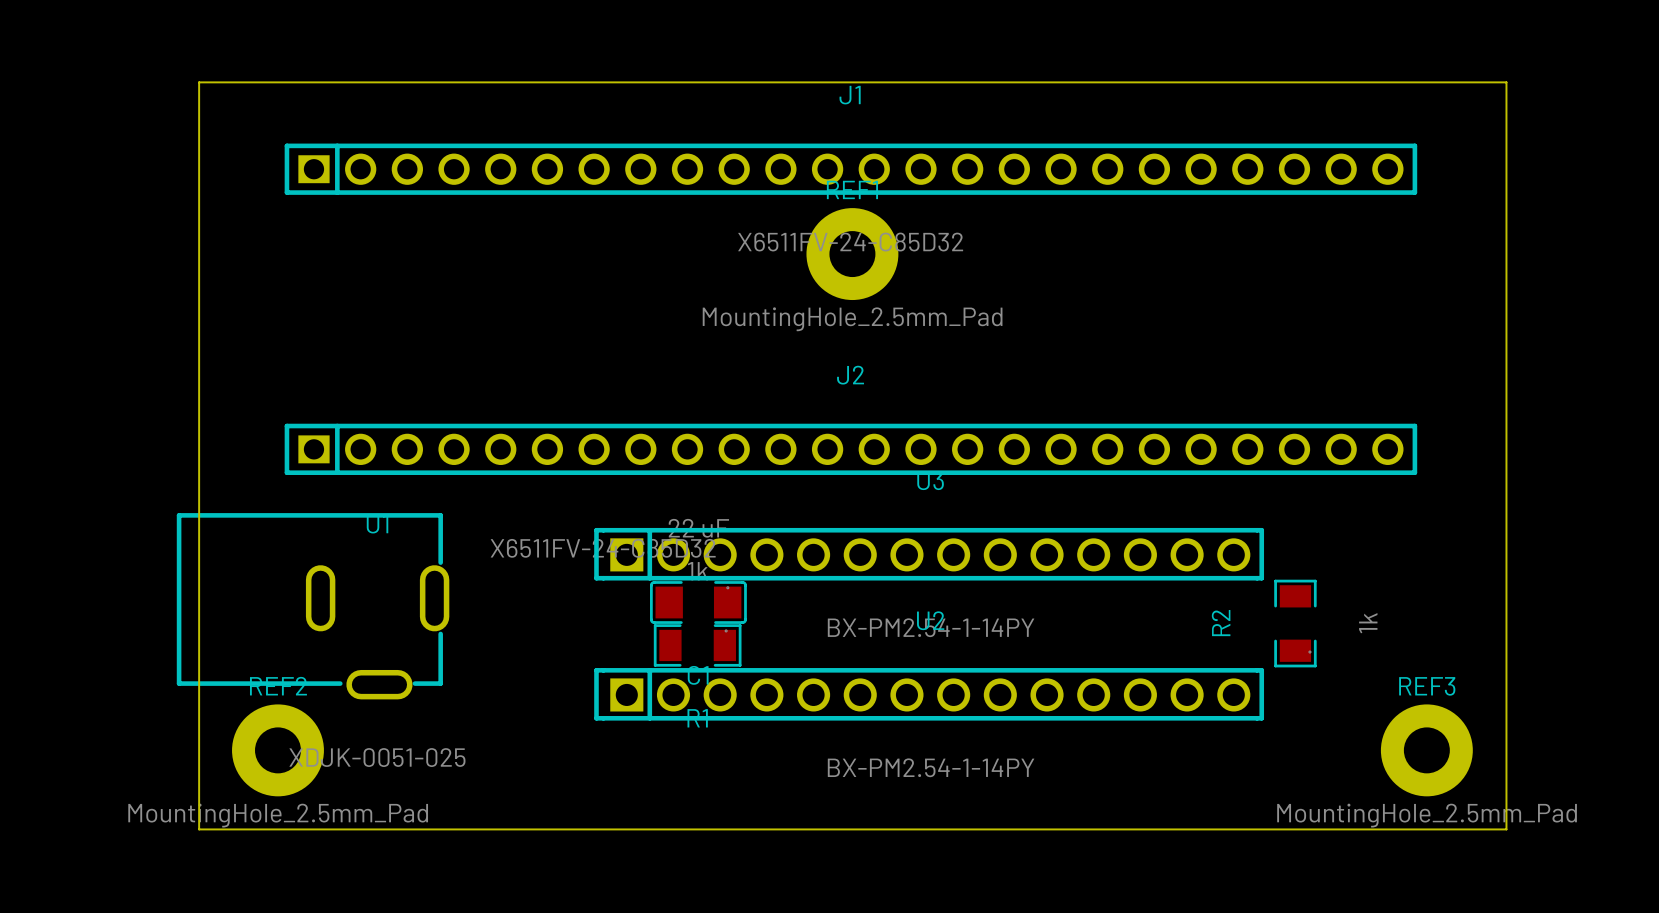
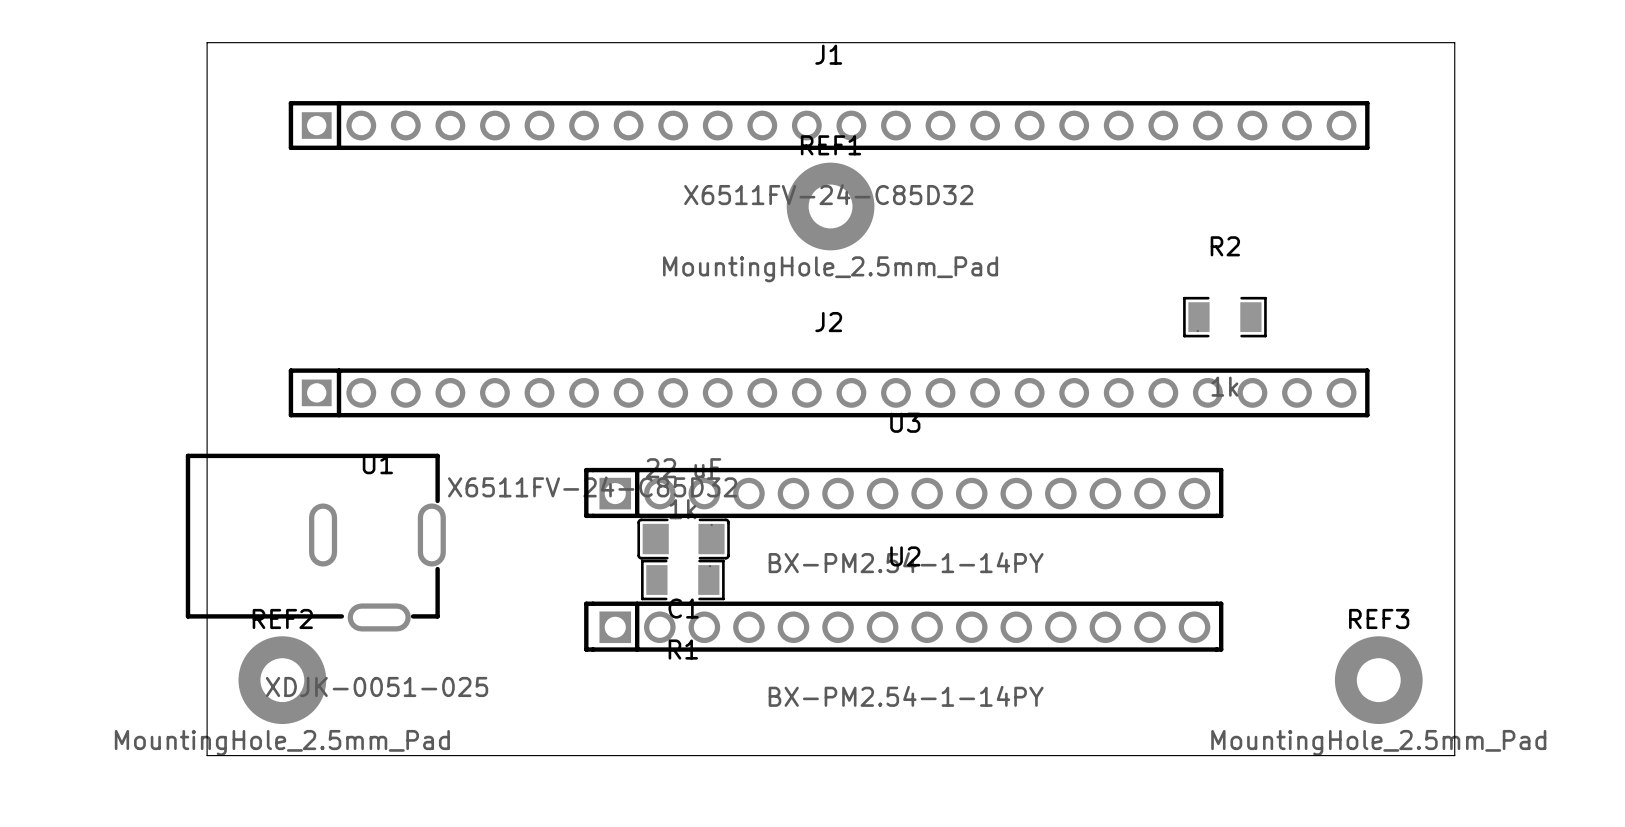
R2 rotation: 0° (1295, 623) -> 90° clockwise (1224, 317)
R2 position: (1295, 623) -> (1224, 317)

